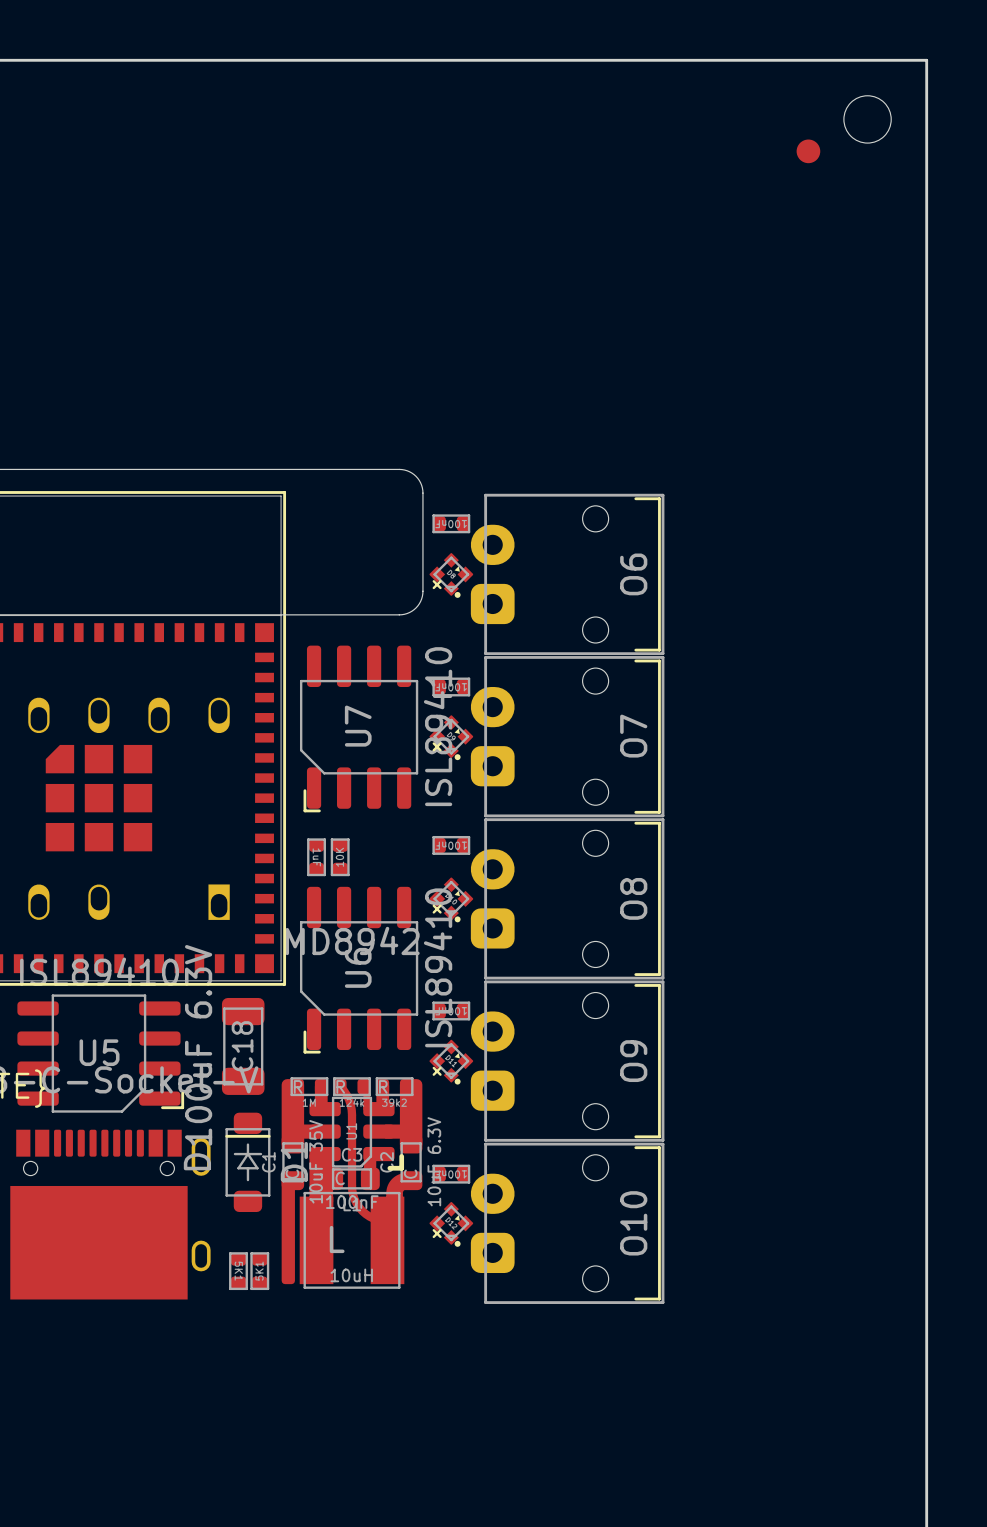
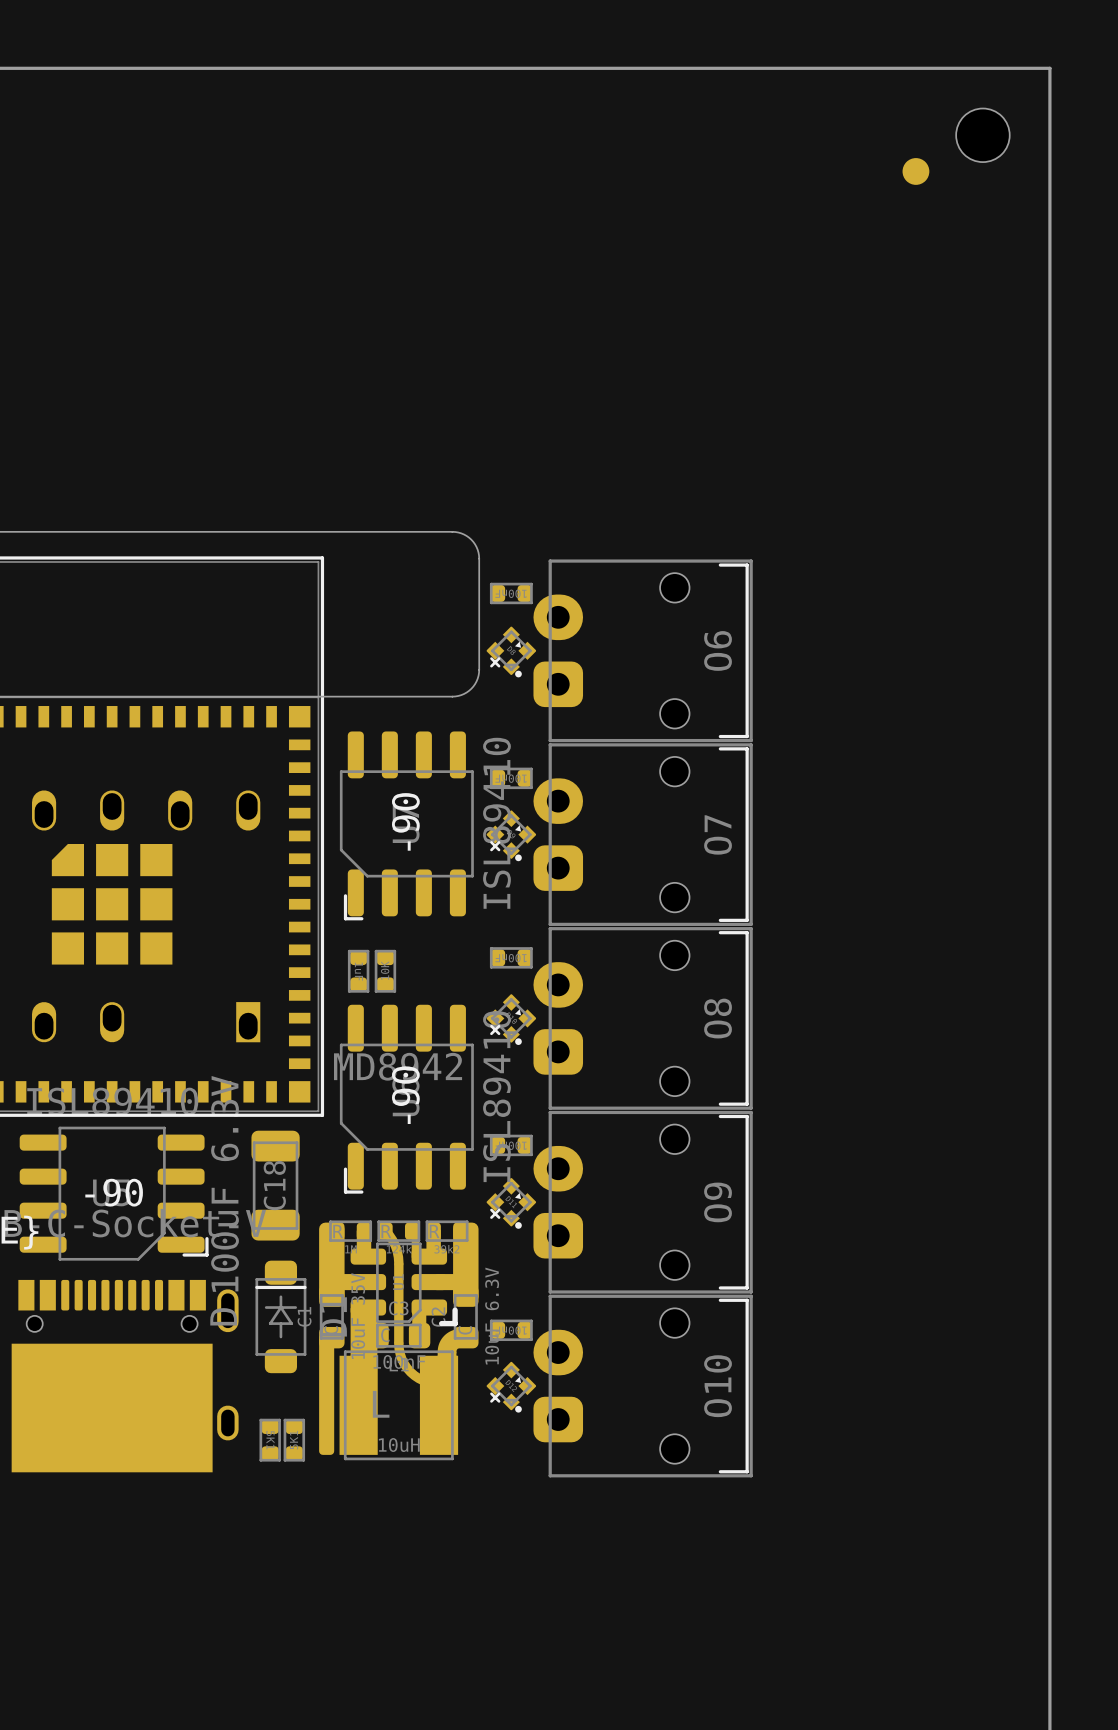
U7 text: none -> -90 (405, 821)
U6 text: none -> -90 (405, 1095)
U5 text: none -> -90 (114, 1192)

